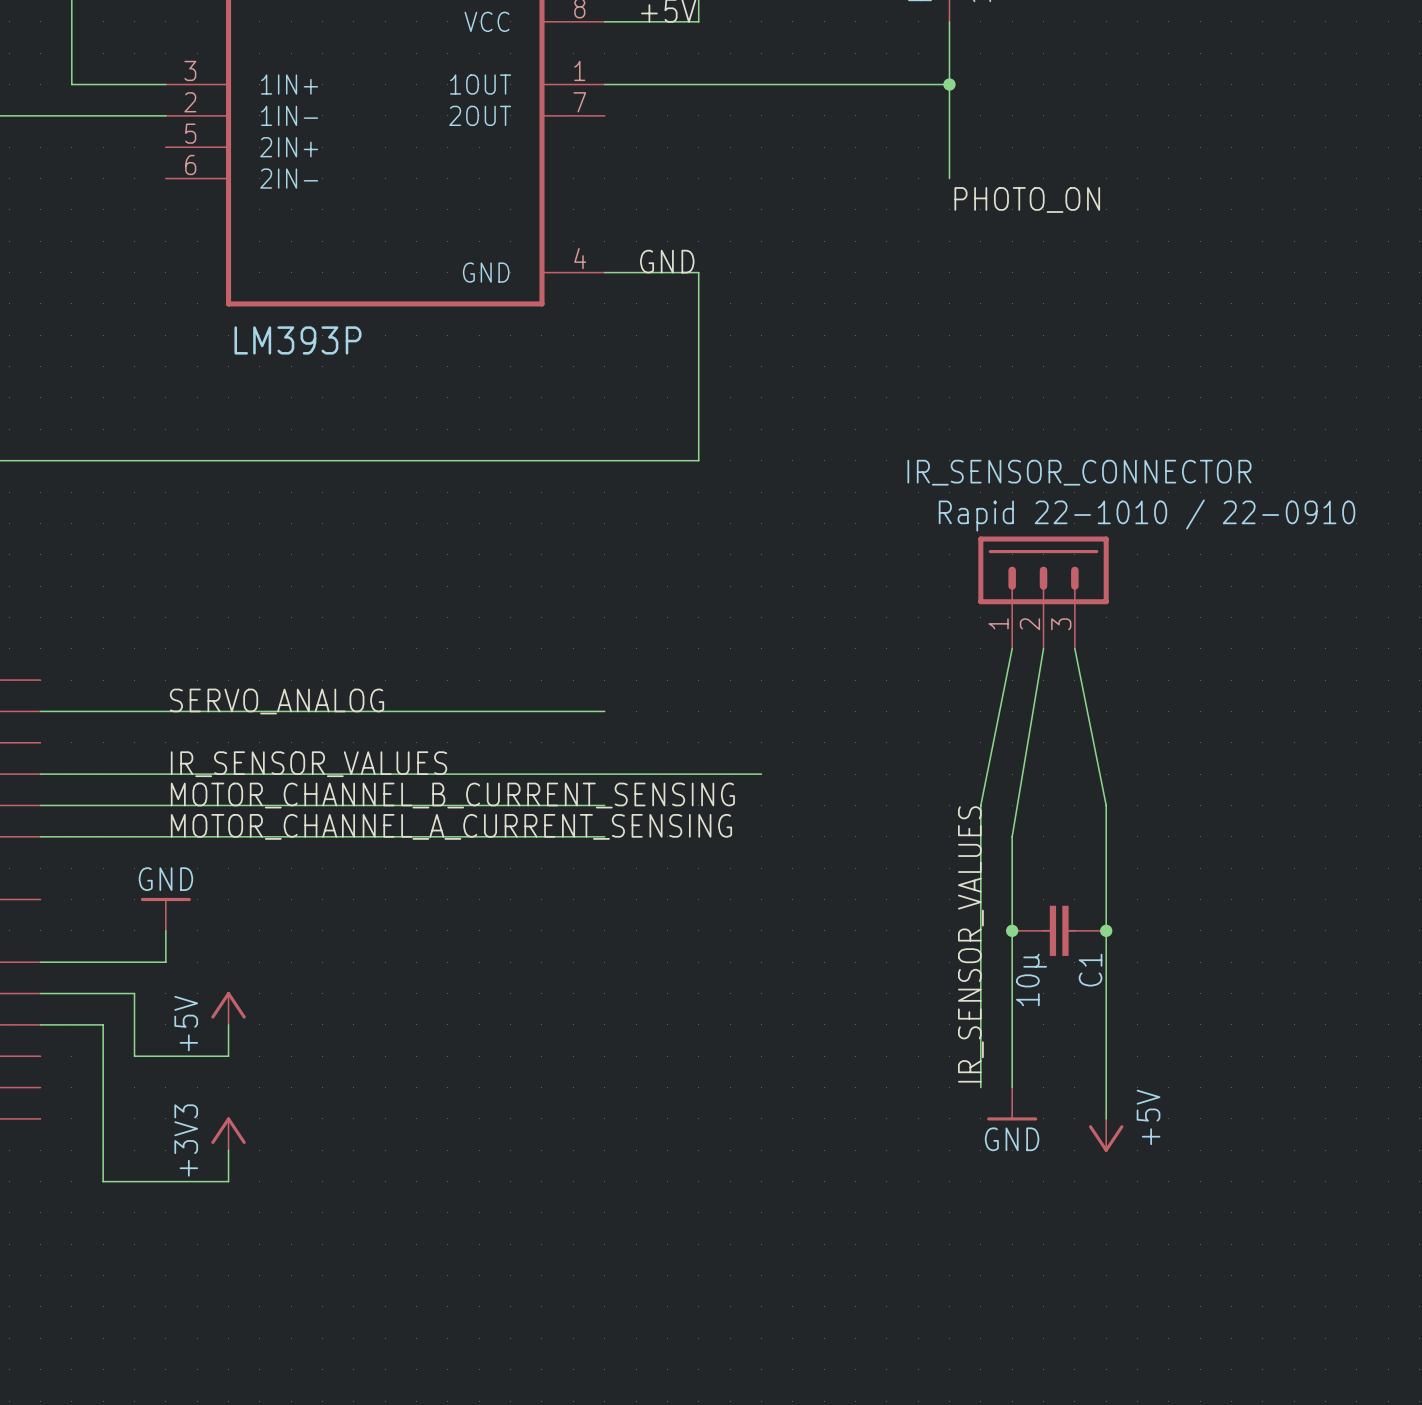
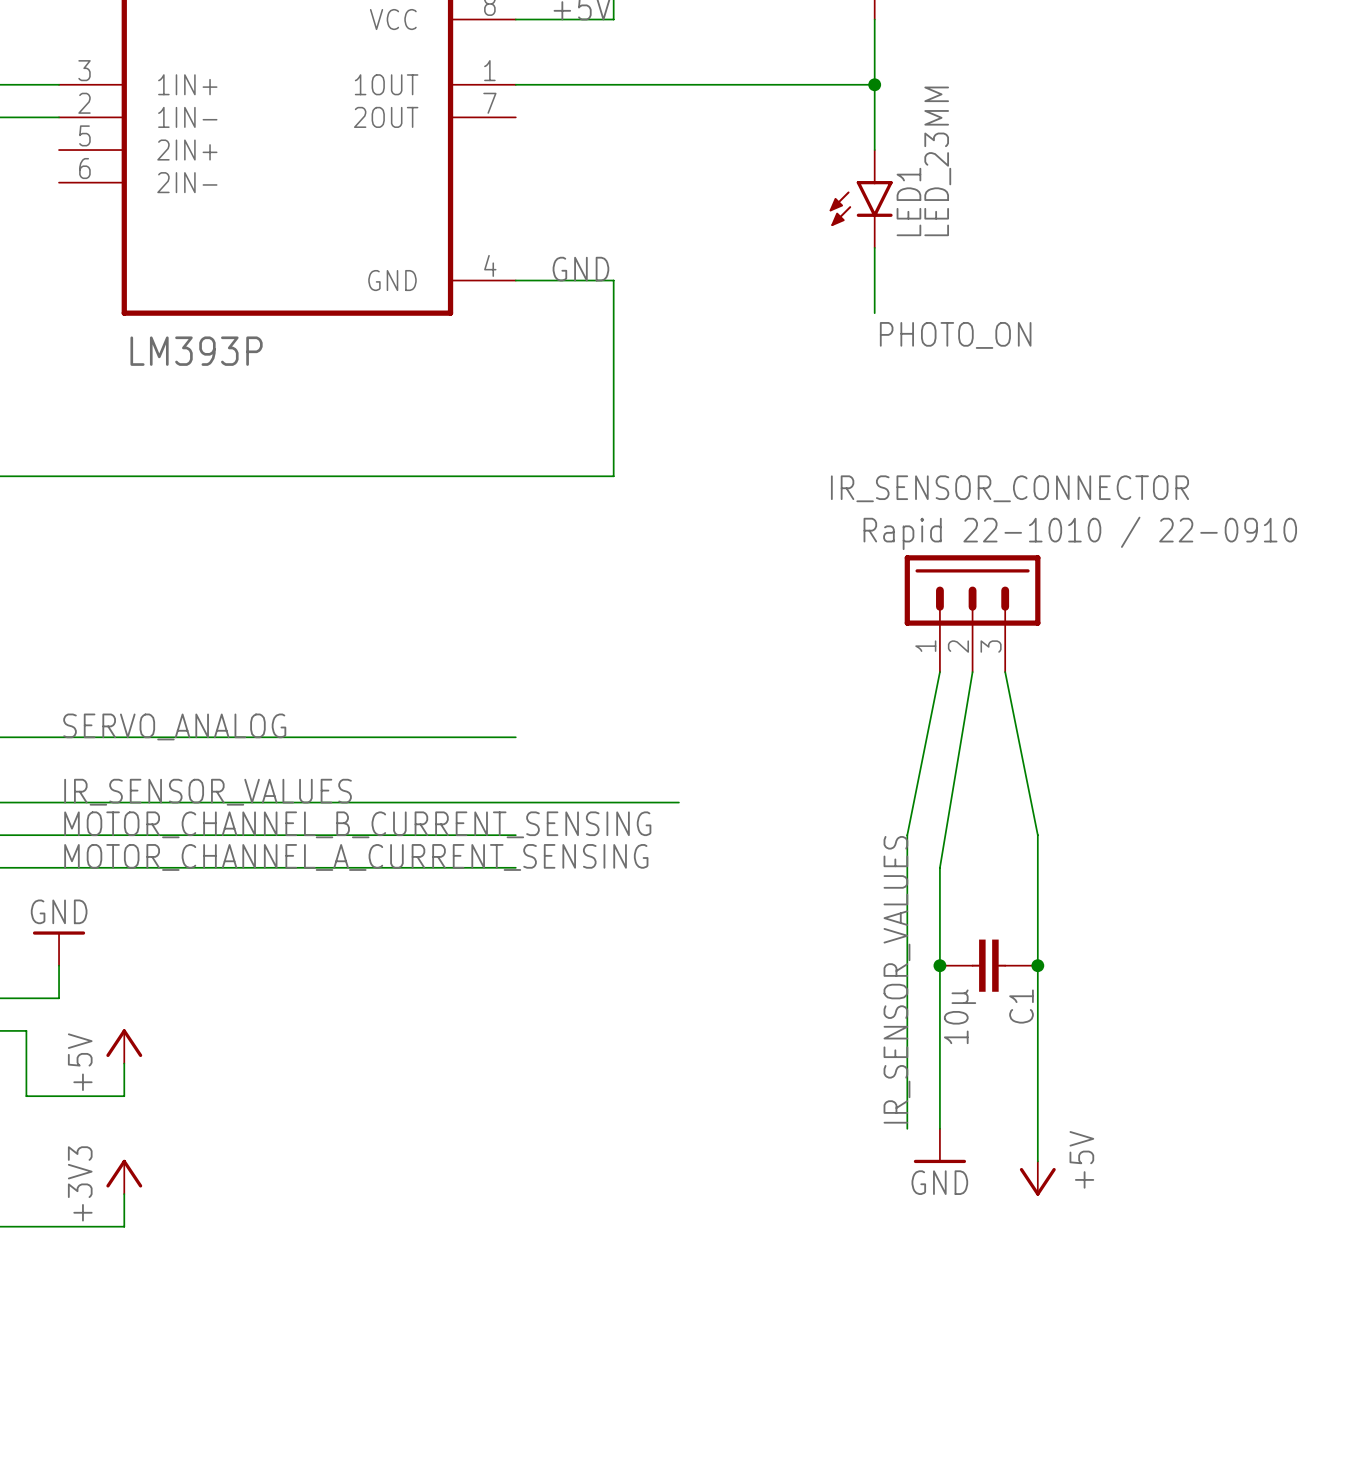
LED1: none -> LED_23MM (861, 198)
label position: PHOTO_ON (1027, 199) -> PHOTO_ON (955, 335)
wire: none -> (874, 247) (874, 313)

